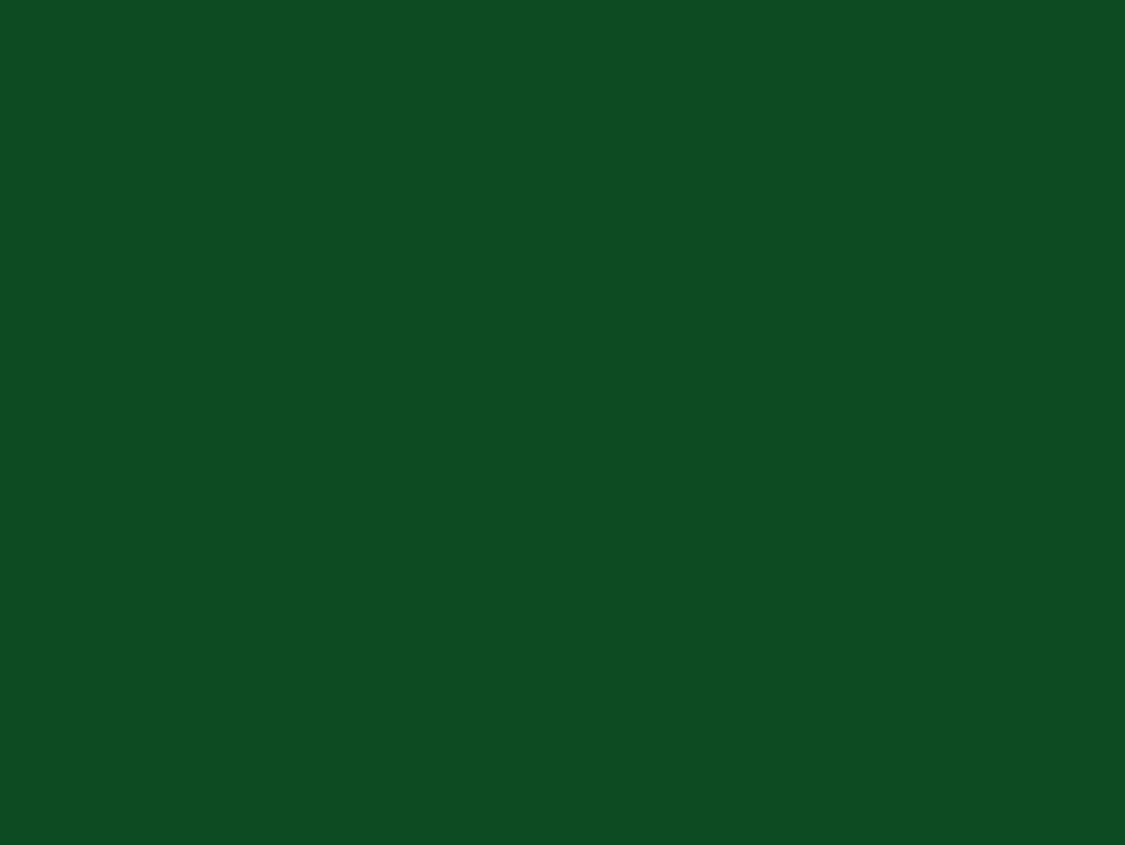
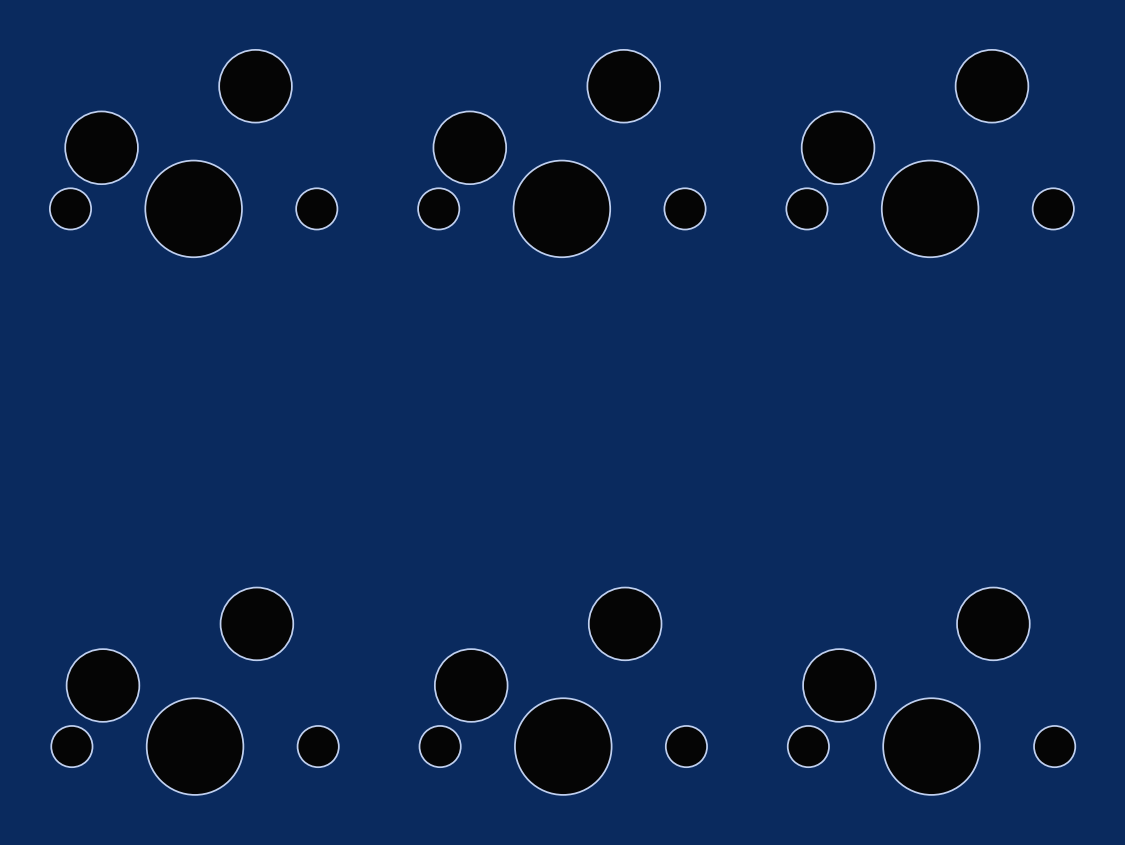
part: none -> (193, 153)
part: none -> (561, 153)
part: none -> (930, 153)
part: none -> (195, 691)
part: none -> (563, 691)
part: none -> (931, 691)

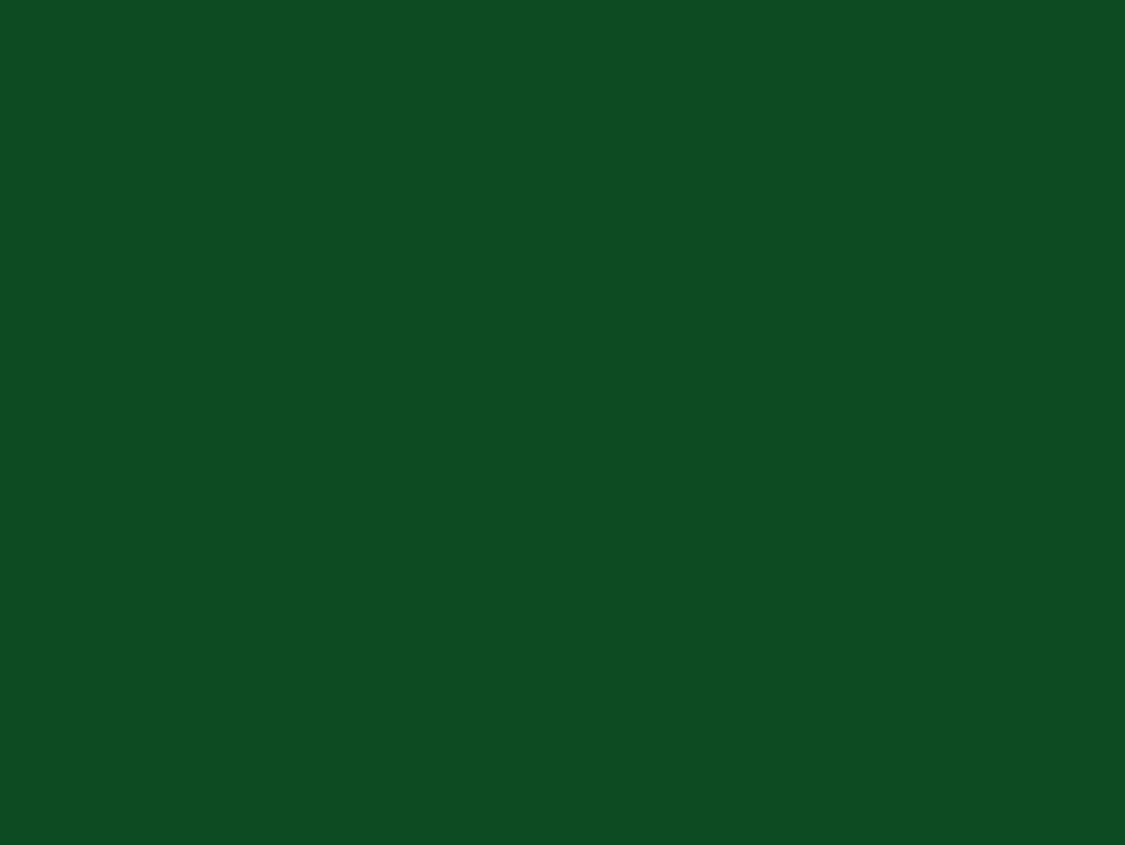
part: (193, 153) -> none
part: (561, 153) -> none
part: (930, 153) -> none
part: (195, 691) -> none
part: (563, 691) -> none
part: (931, 691) -> none

